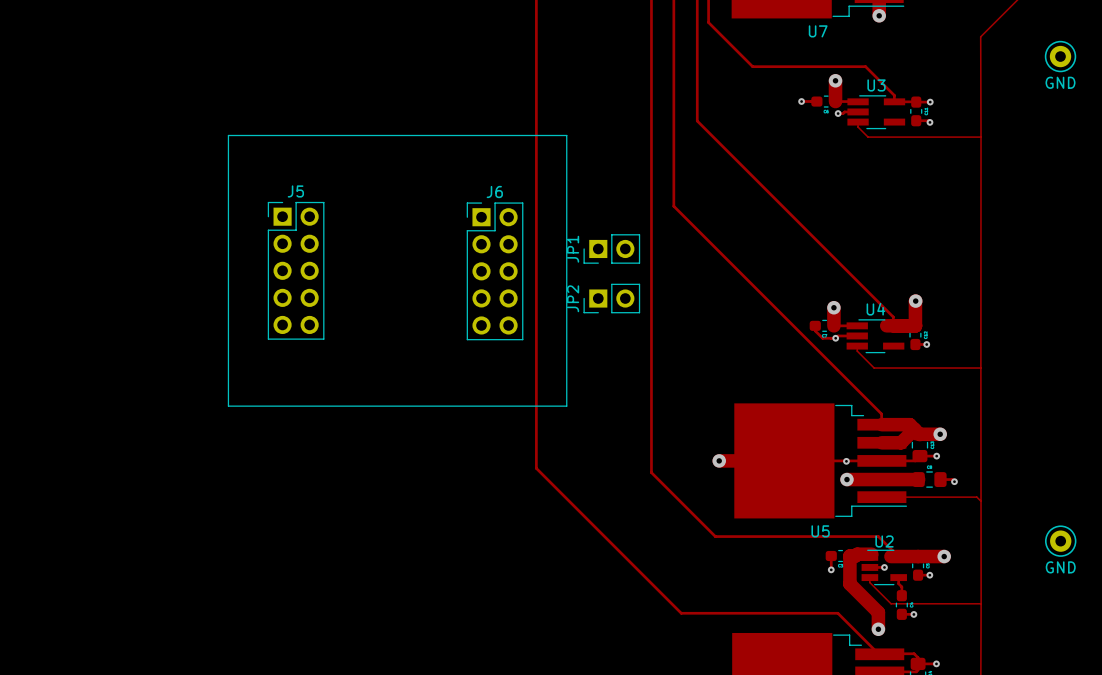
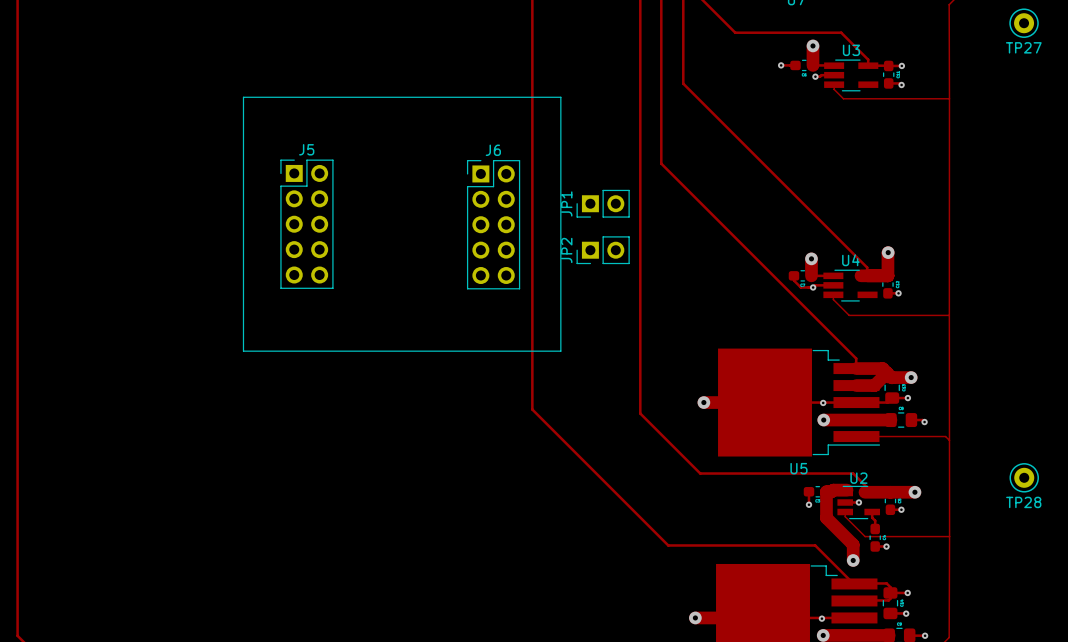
GND name: GND (1060, 82) -> TP27 (1023, 47)
GND name: GND (1060, 567) -> TP28 (1023, 502)

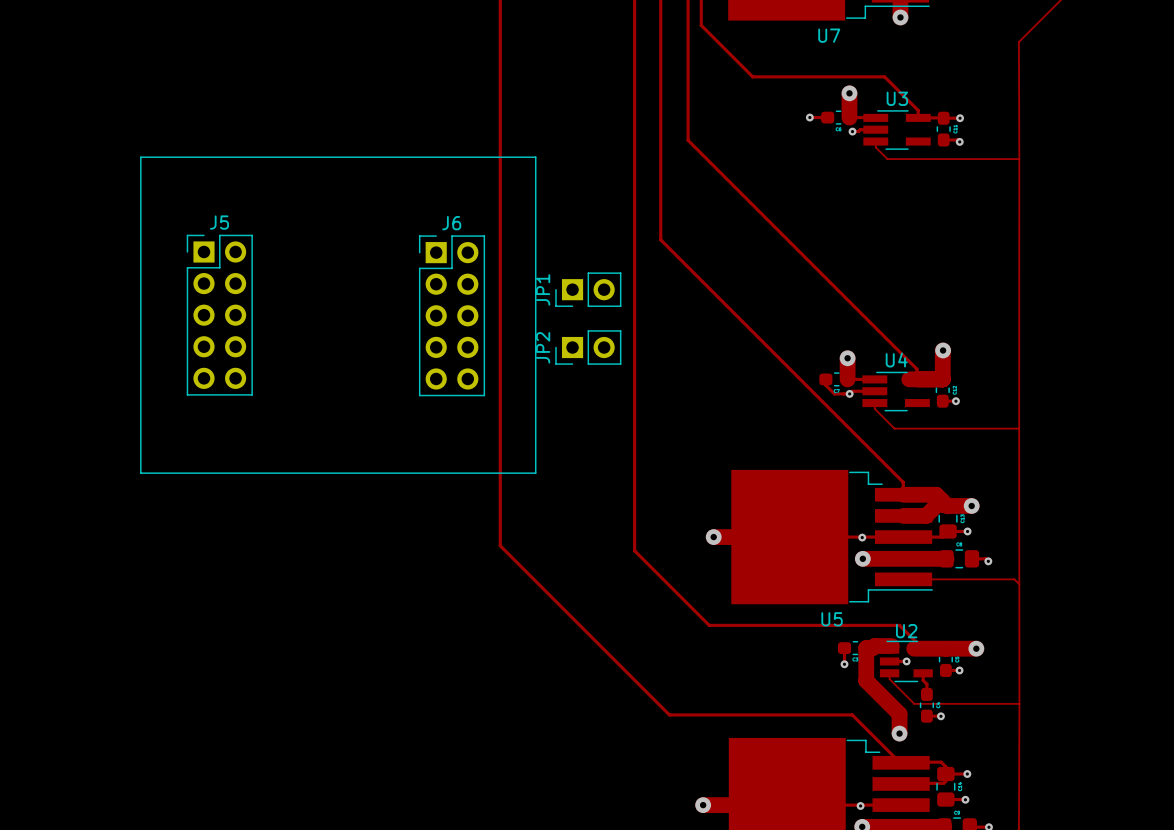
TP27: (1024, 23) -> none
TP28: (1024, 477) -> none

